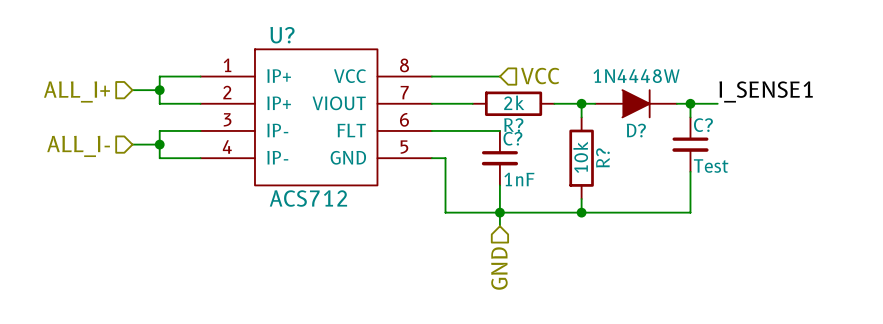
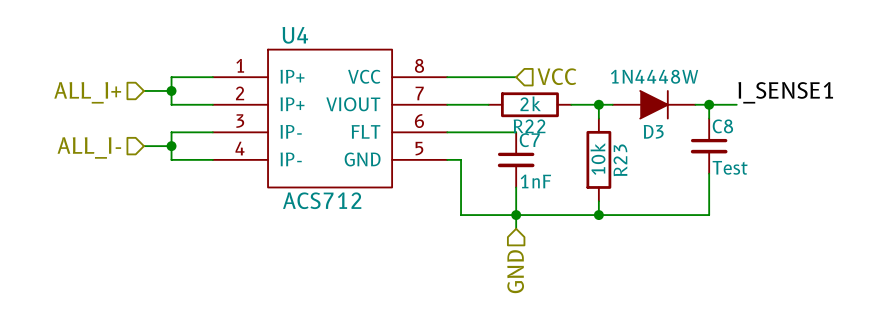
U? name: U? (282, 35) -> U4 (295, 35)
R? name: R? (513, 125) -> R22 (529, 126)
C? name: C? (703, 125) -> C8 (722, 126)
D? name: D? (636, 130) -> D3 (653, 131)
C? name: C? (512, 138) -> C7 (529, 140)
R? name: R? (602, 157) -> R23 (620, 160)

